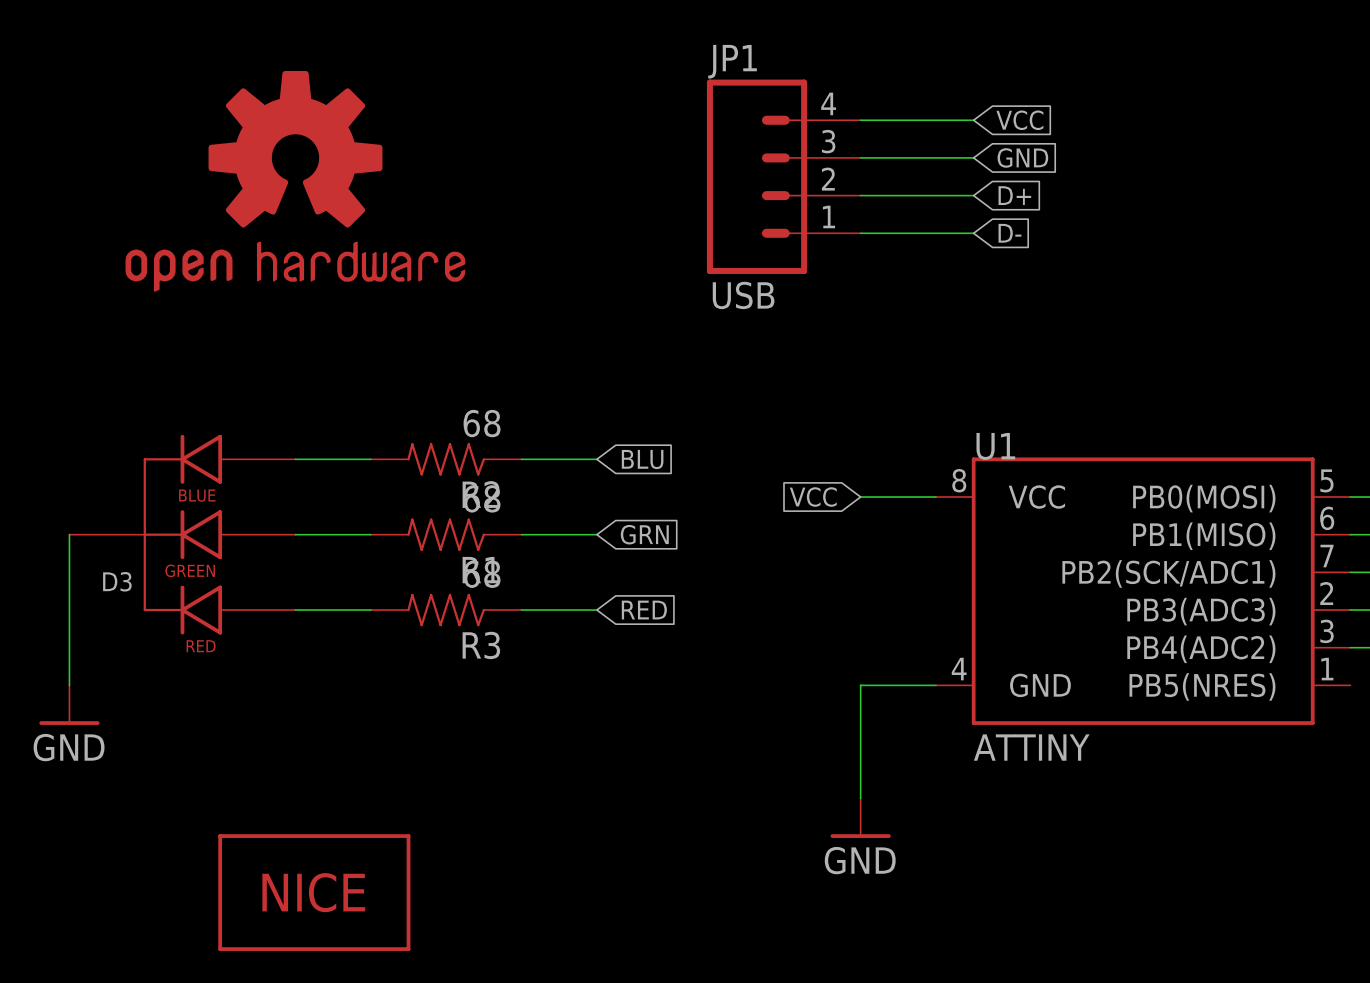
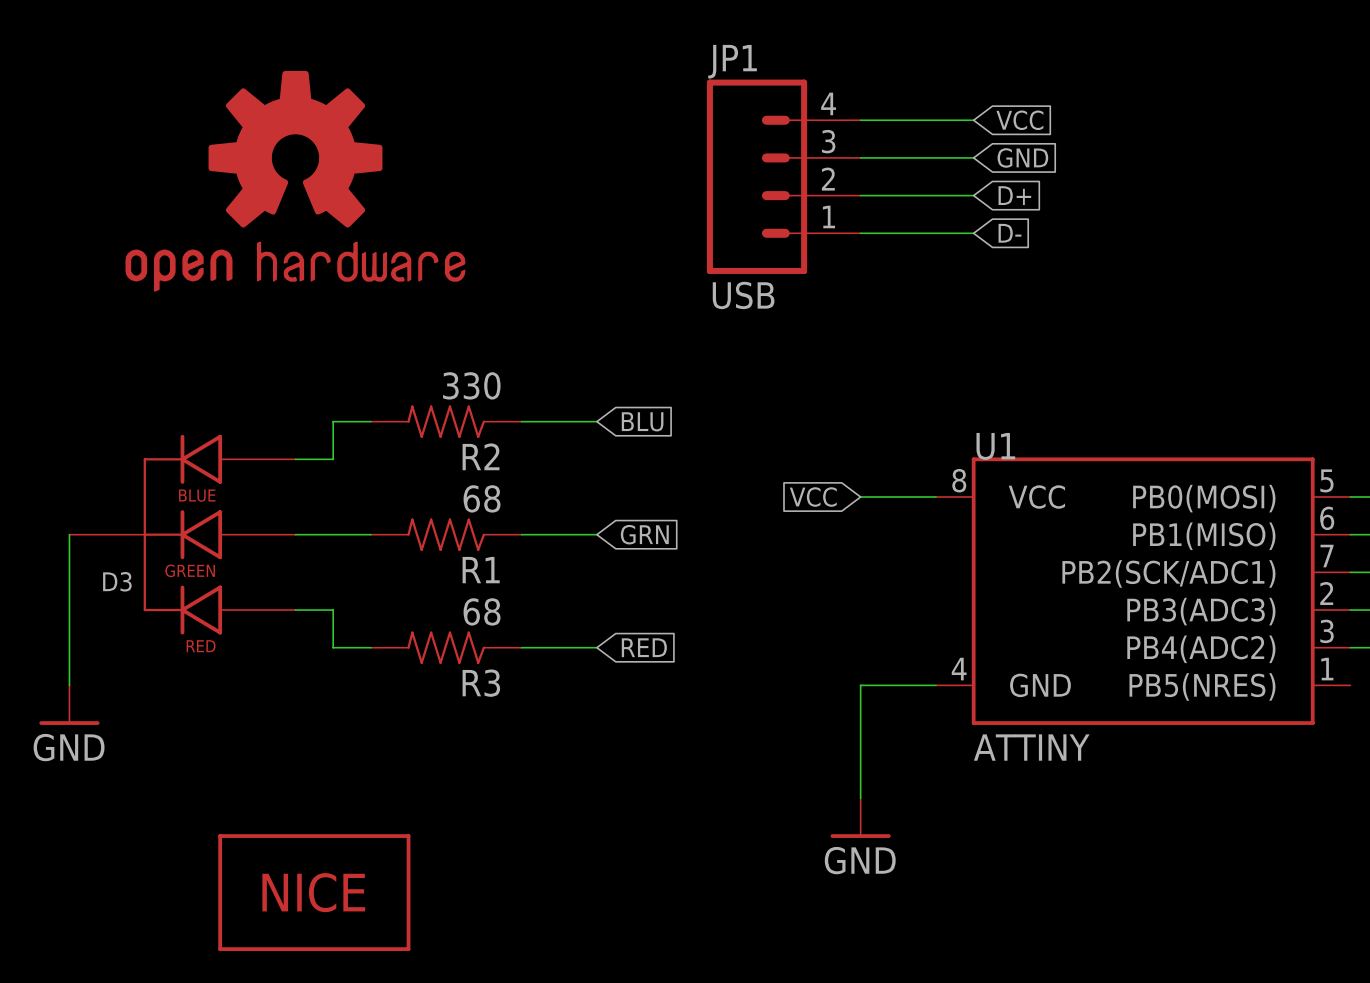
R2 value: 68 (482, 423) -> 330 (471, 385)
wire: (333, 459) (370, 459) -> (333, 459) (333, 421) (370, 421)
R2 position: (446, 459) -> (446, 421)
wire: (521, 459) (596, 459) -> (521, 421) (596, 421)
global label position: BLU (642, 459) -> BLU (642, 421)
wire: (333, 610) (370, 610) -> (333, 610) (333, 647) (370, 647)
R3 position: (446, 610) -> (446, 647)
wire: (521, 610) (596, 610) -> (521, 647) (596, 647)
global label position: RED (644, 610) -> RED (644, 647)

